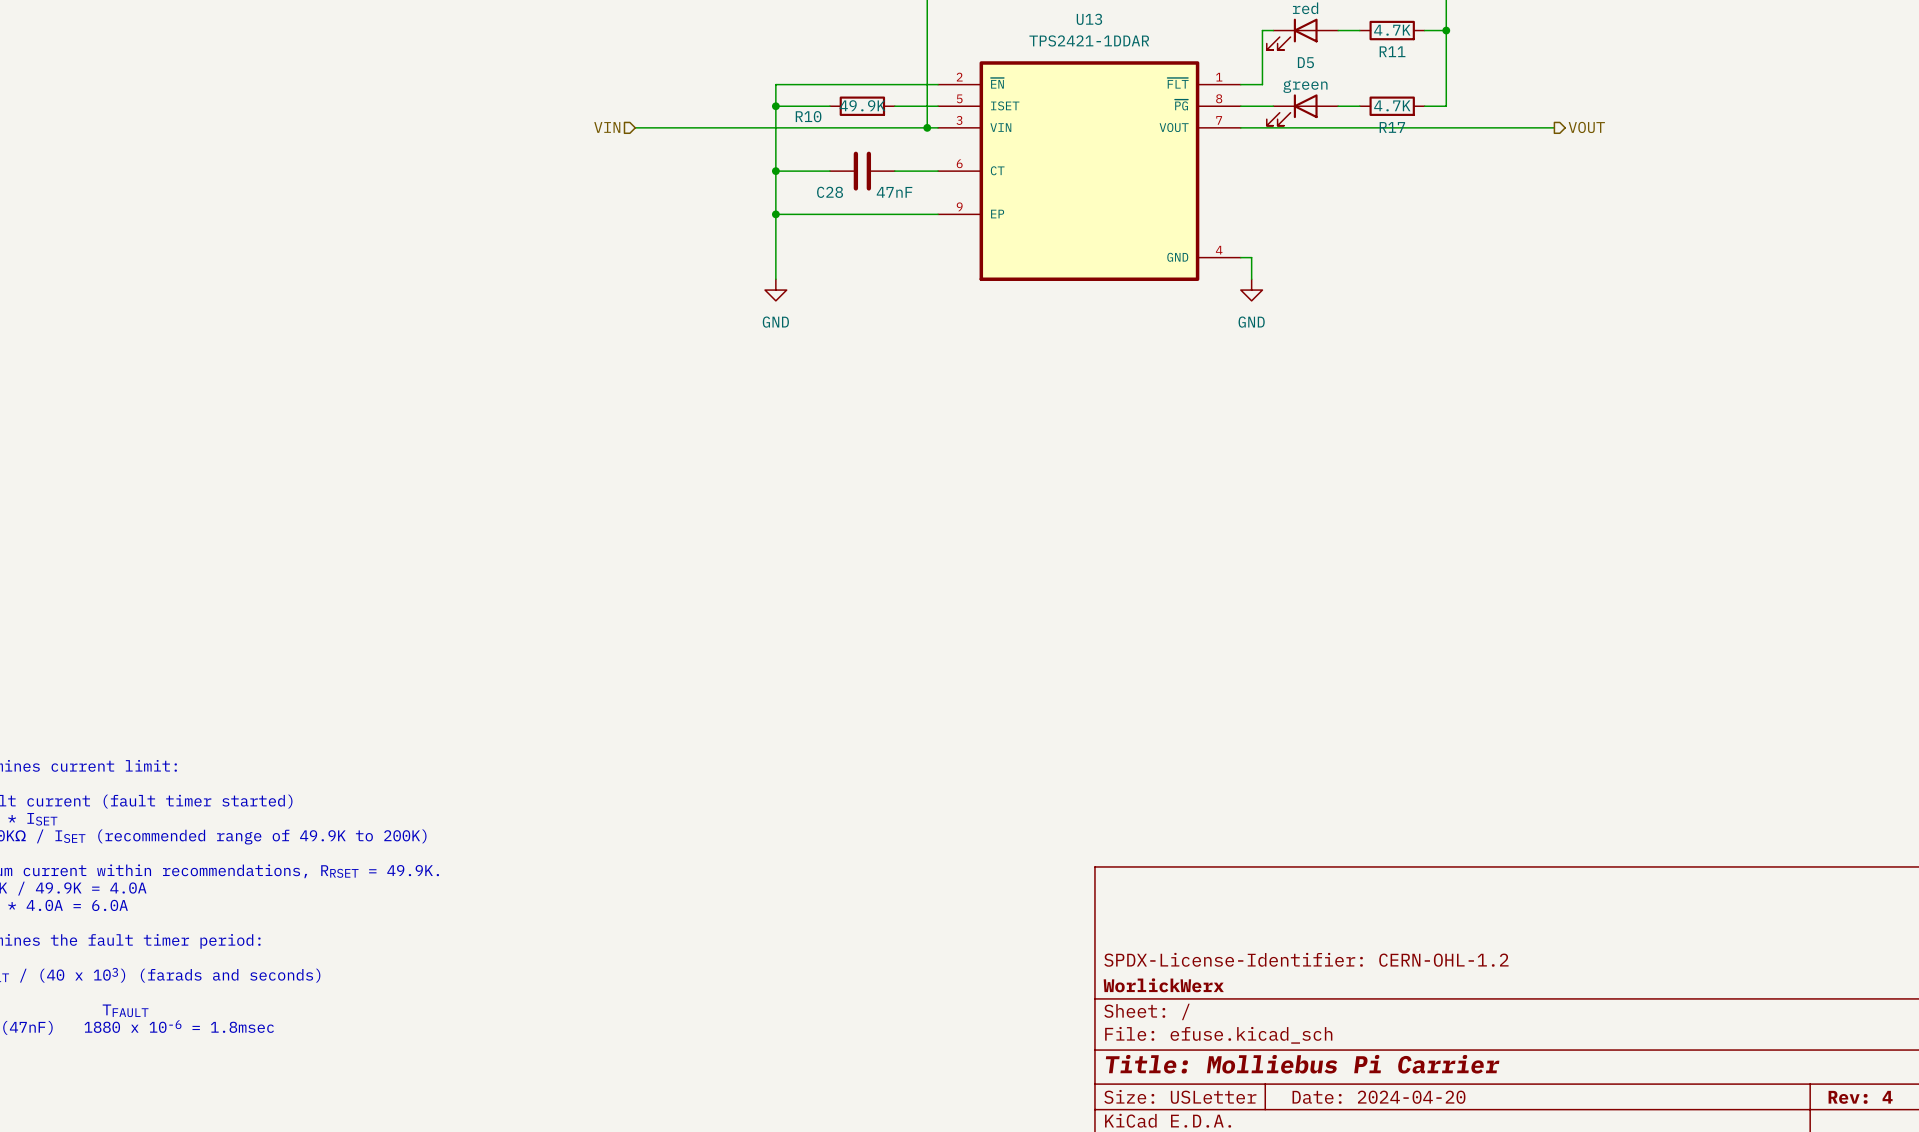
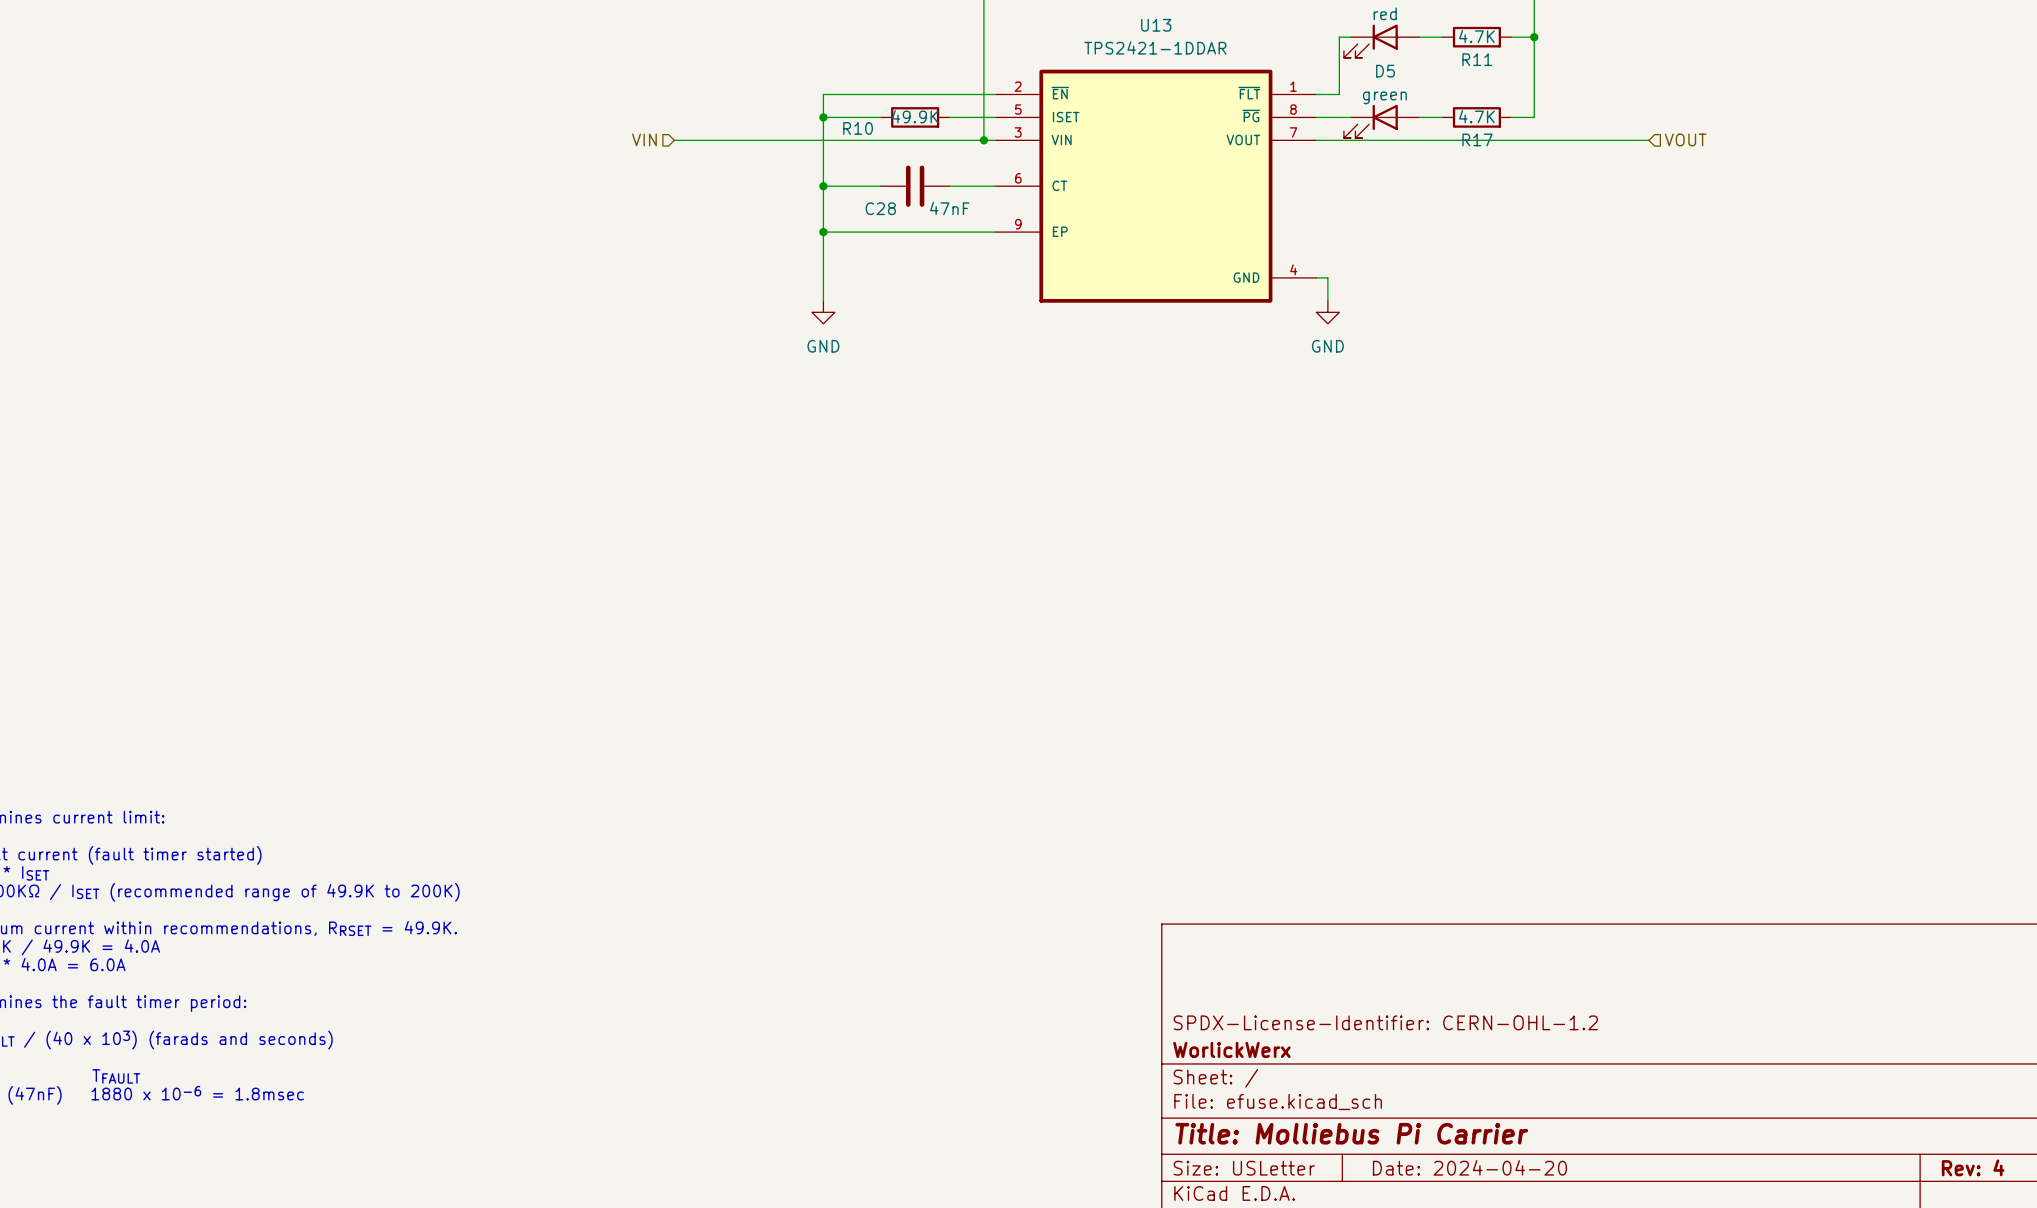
hierarchical label shape: output (1586, 127) -> input (1685, 139)

